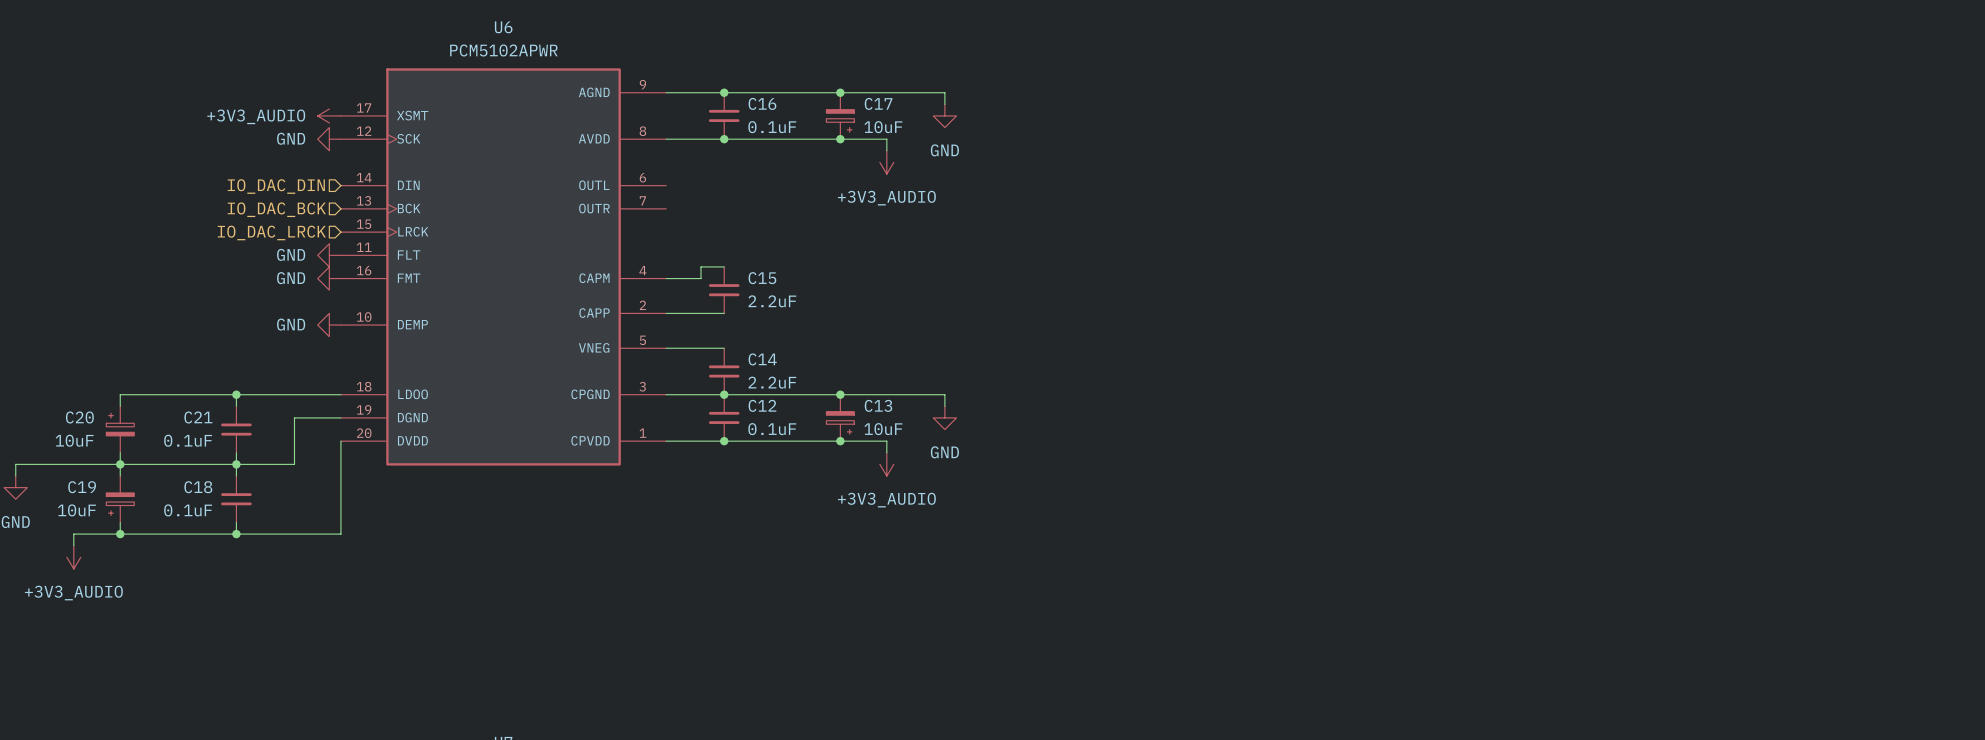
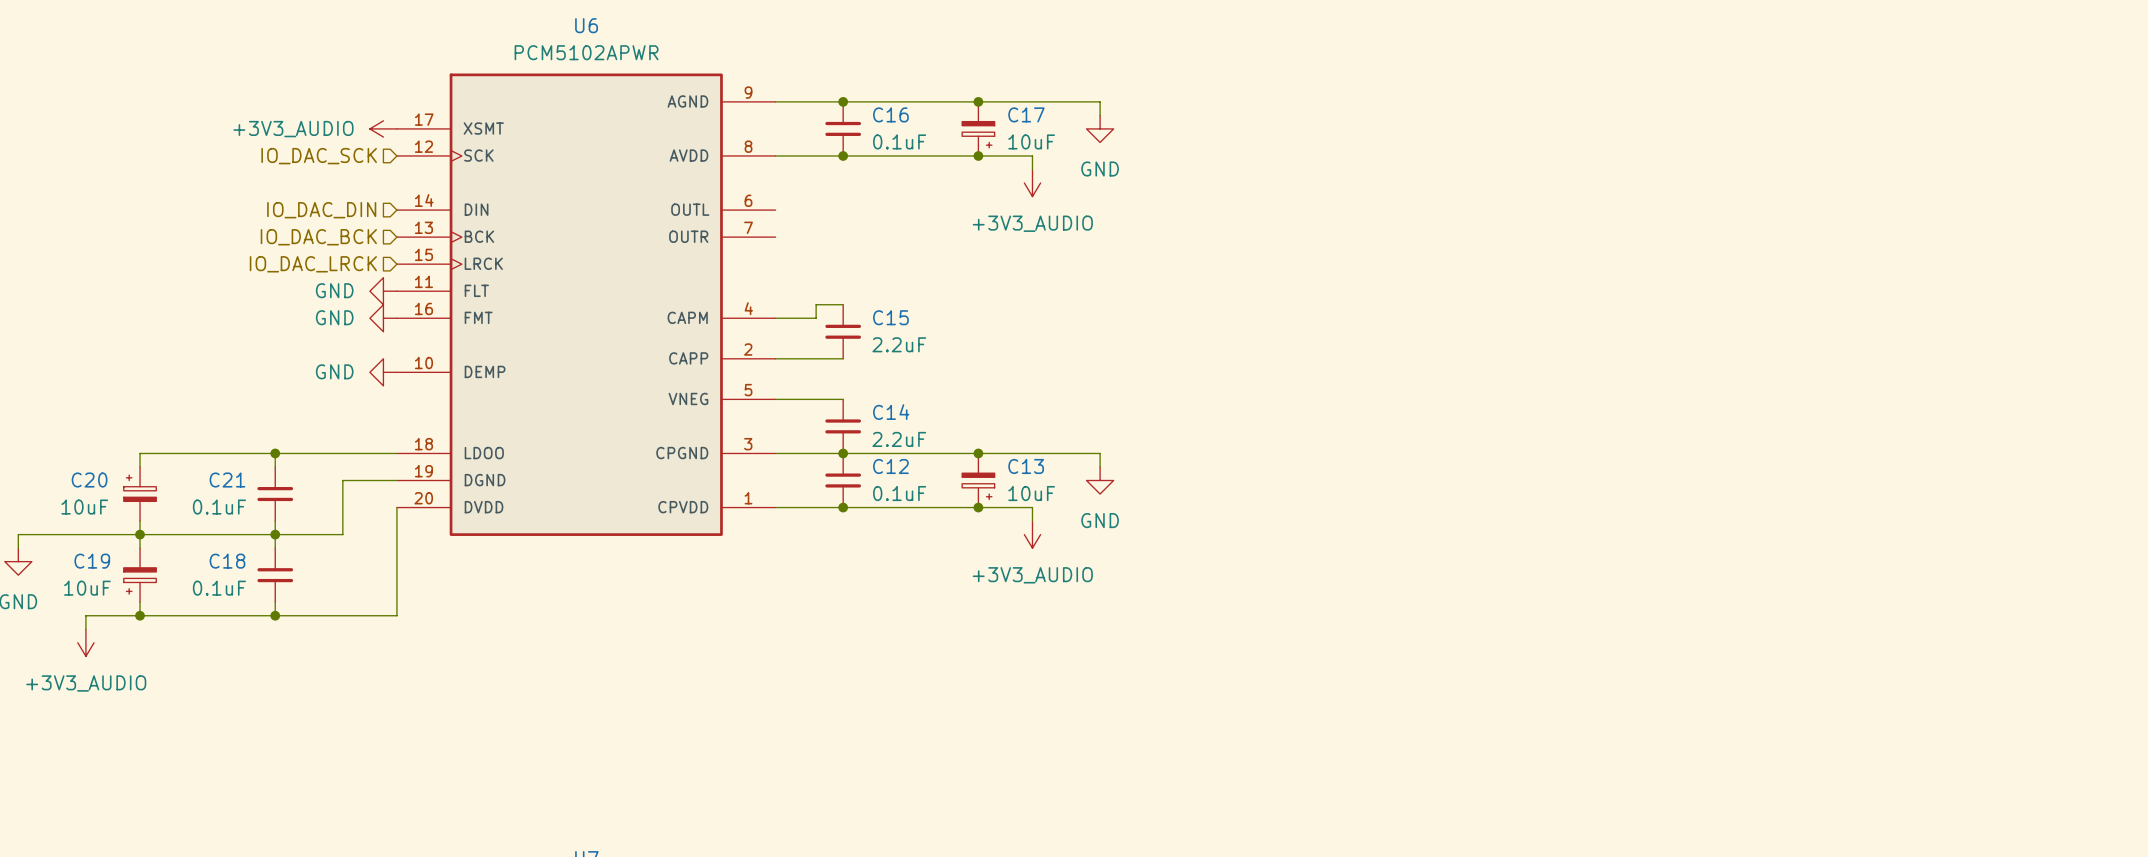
power symbol: GND (329, 139) -> none
hierarchical label: none -> IO_DAC_SCK (319, 156)

